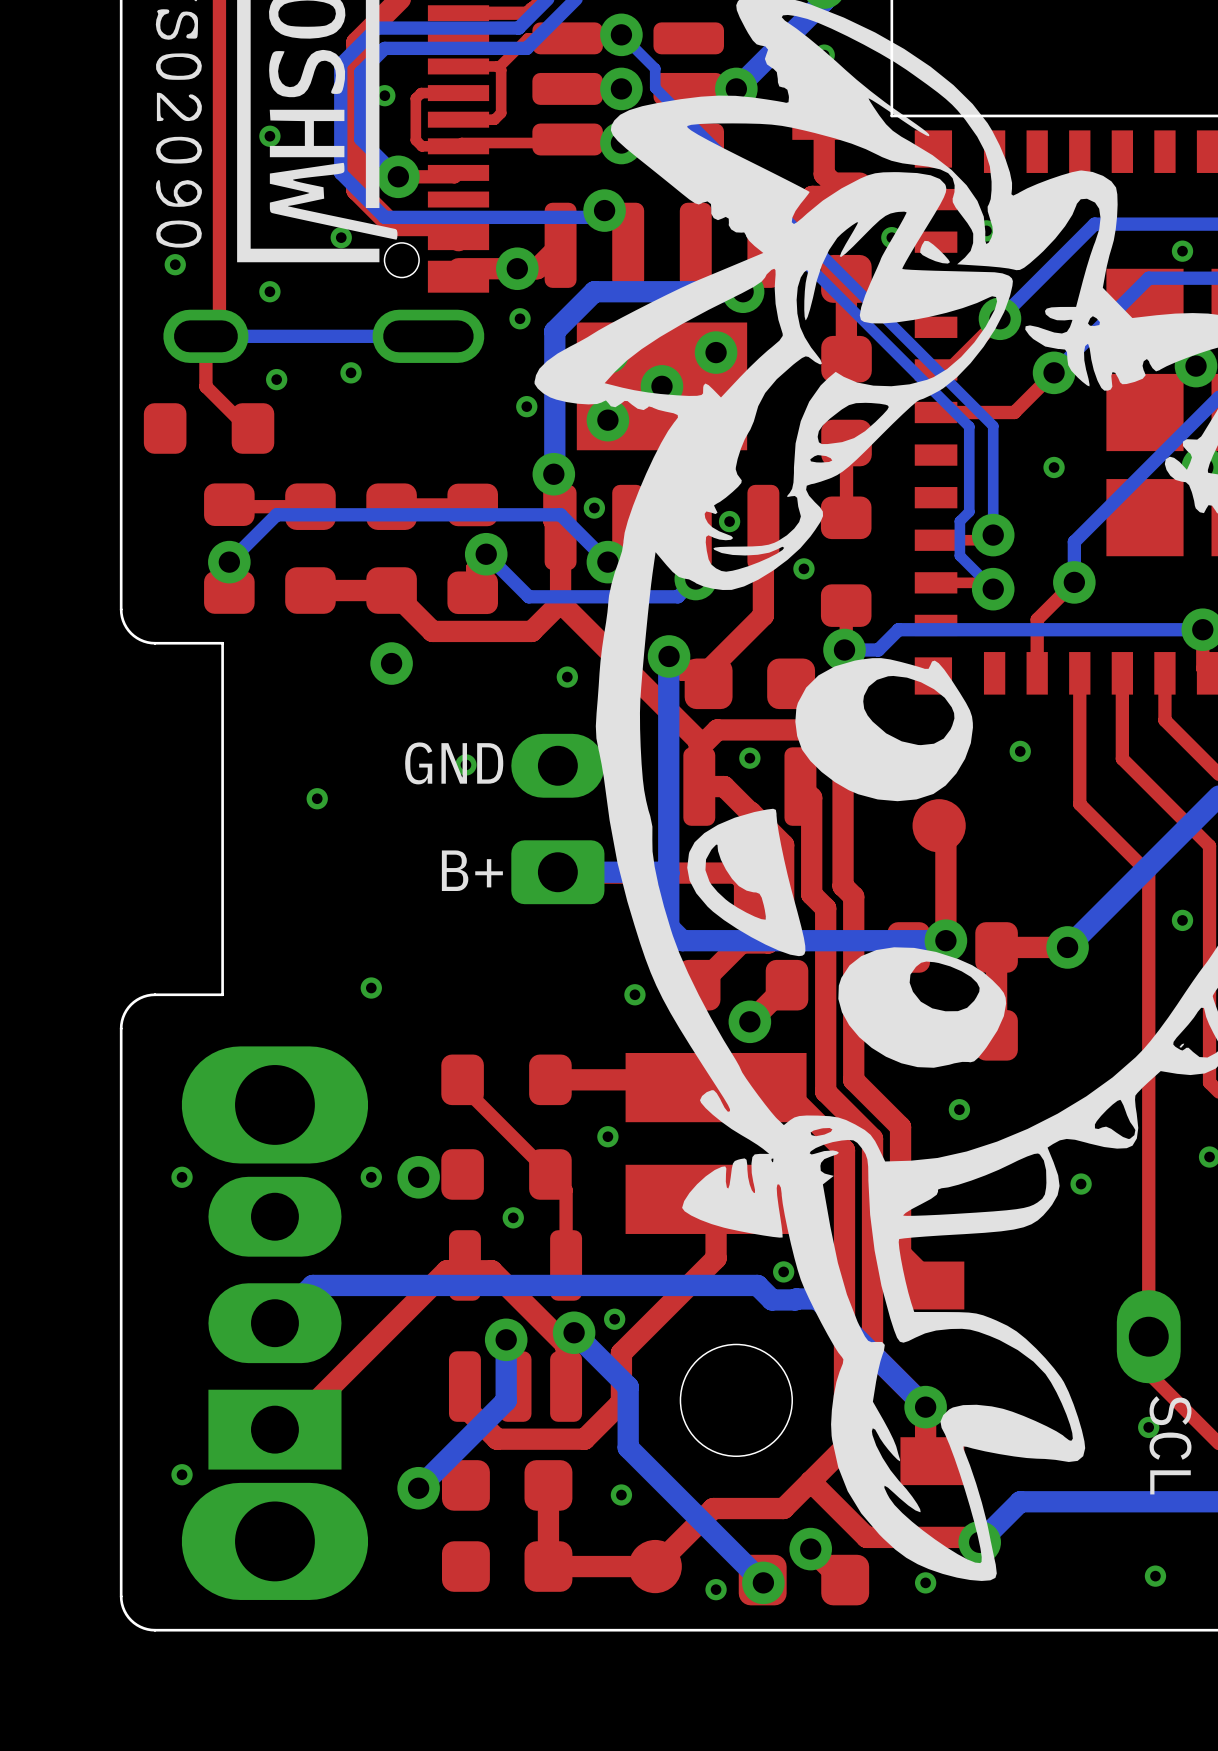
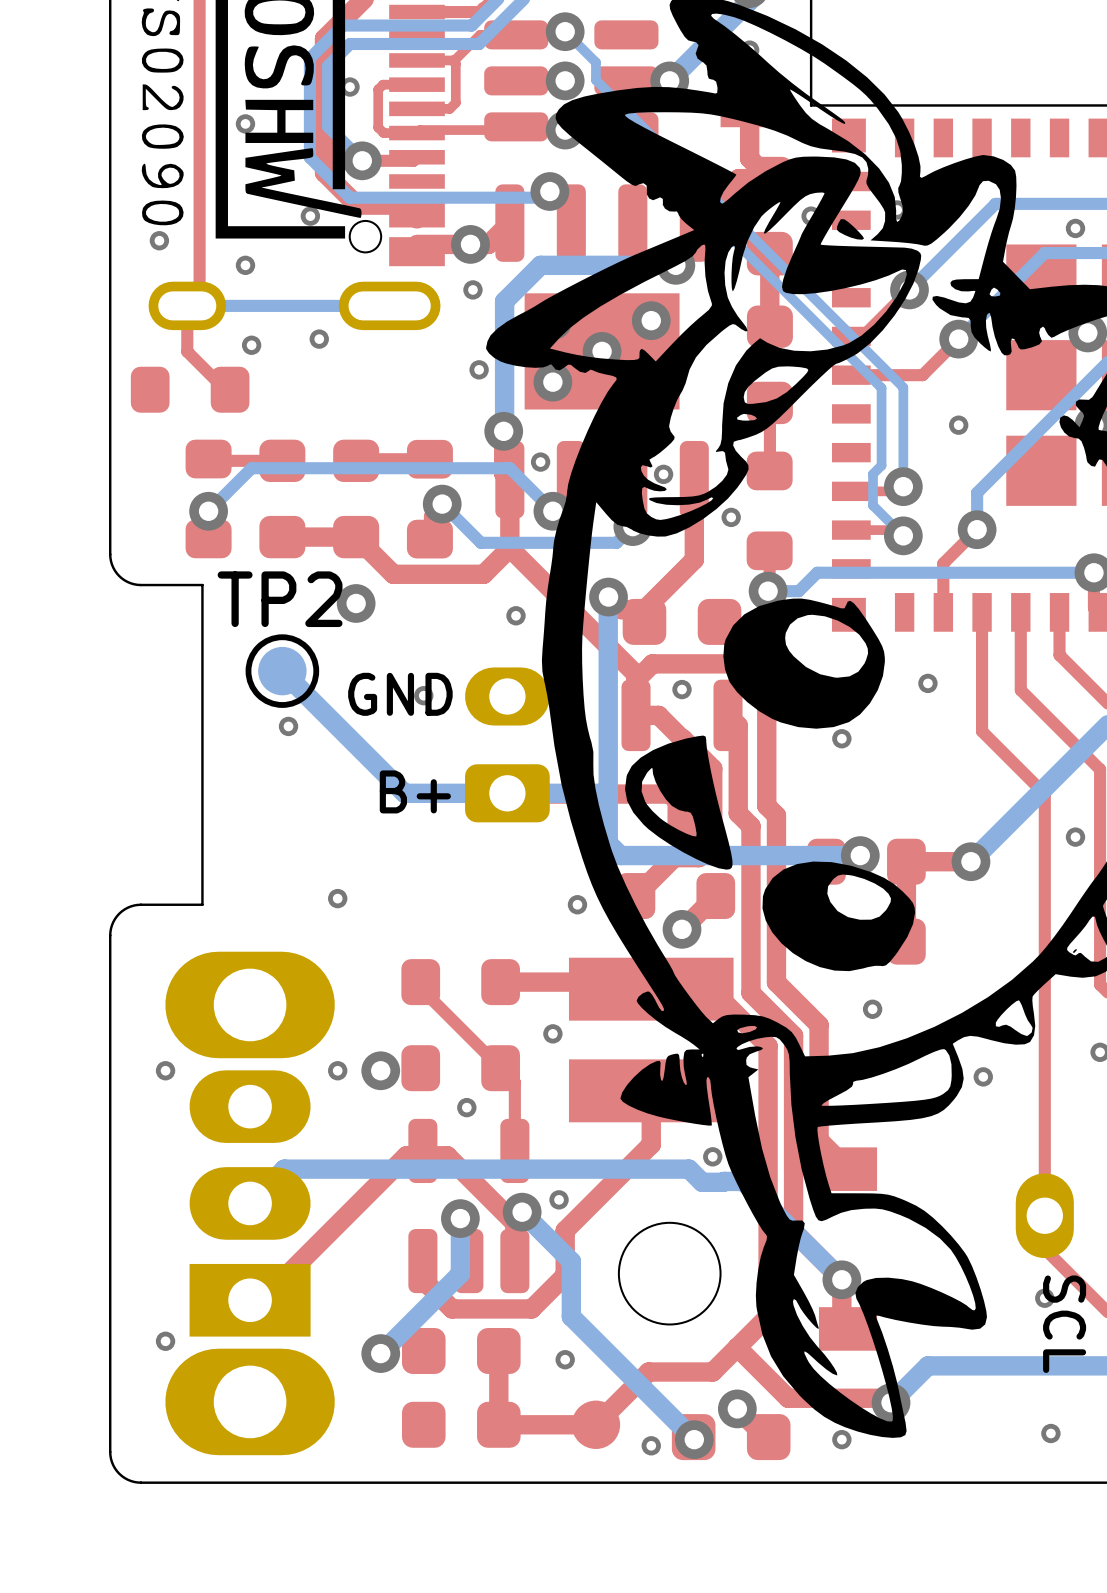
bottom track: none -> (282, 671) (404, 793) (507, 793)
via: none -> (841, 738)
top track: (939, 825) (945, 832) (945, 940) -> none
TP2 side: top (939, 825) -> bottom (282, 671)

